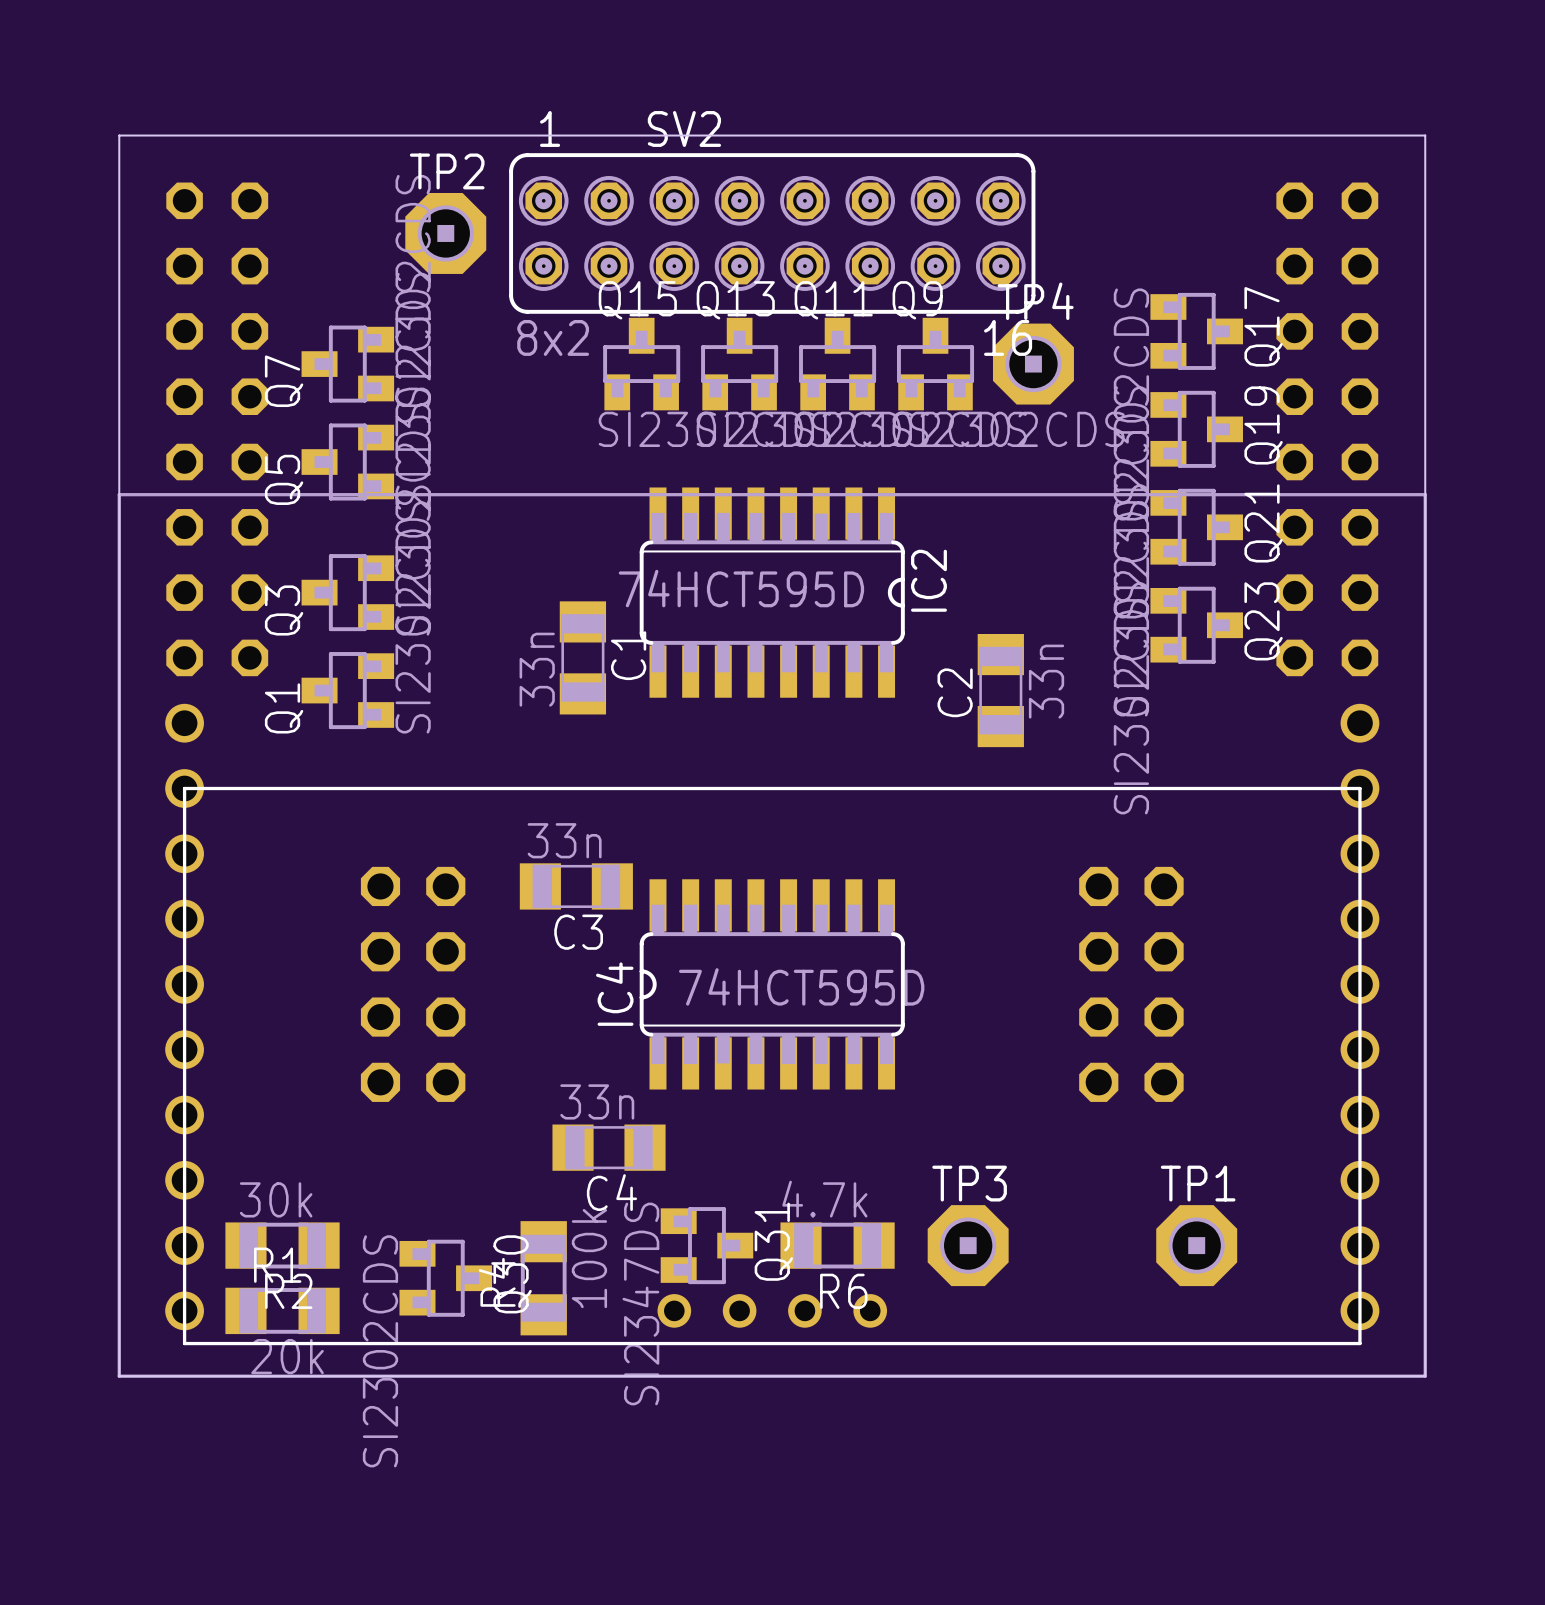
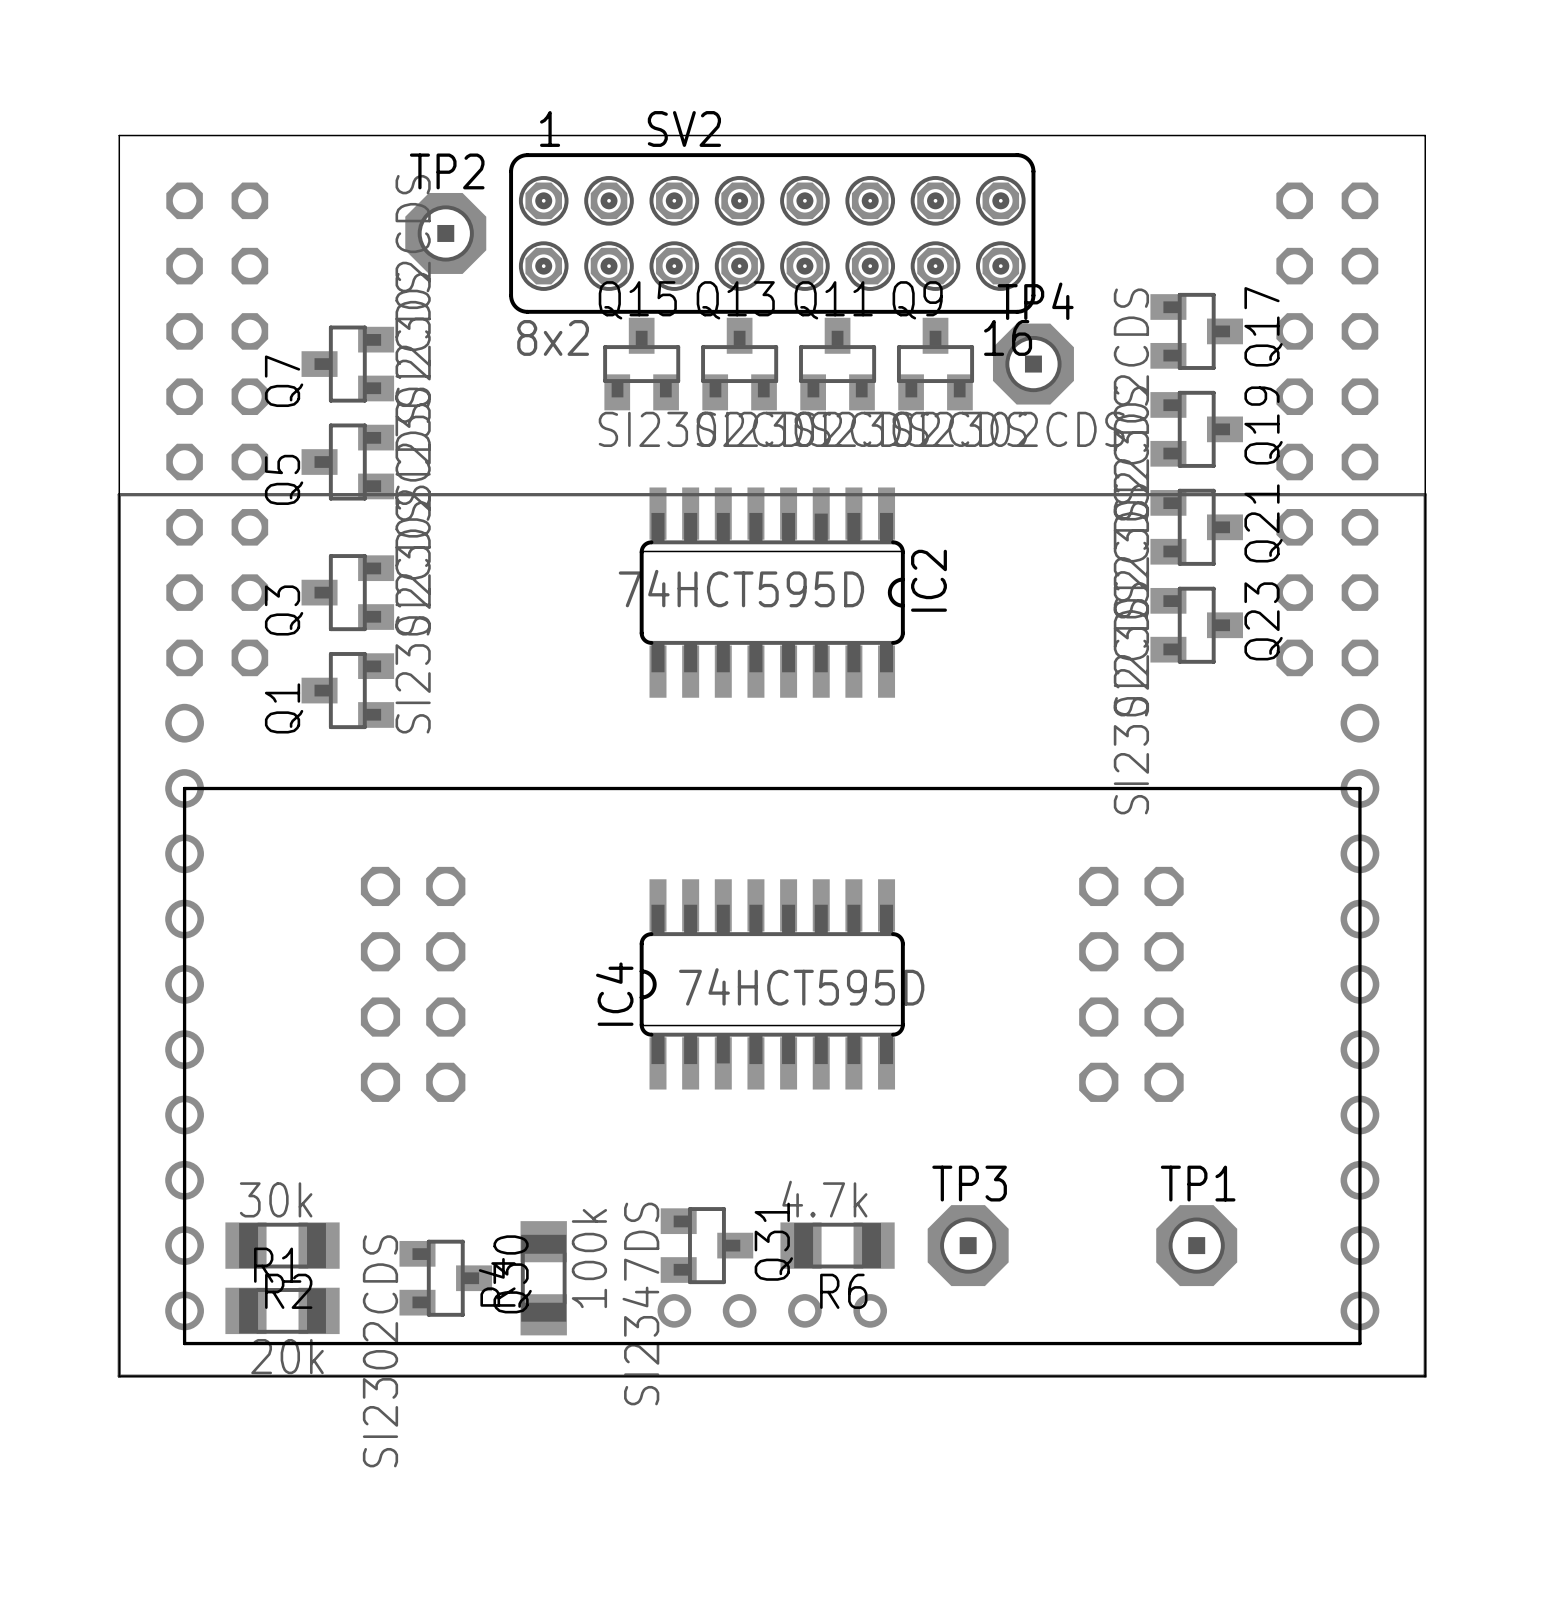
C1: 33n (582, 657) -> none
C2: 33n (1000, 690) -> none
C3: 33n (576, 886) -> none
C4: 33n (609, 1147) -> none

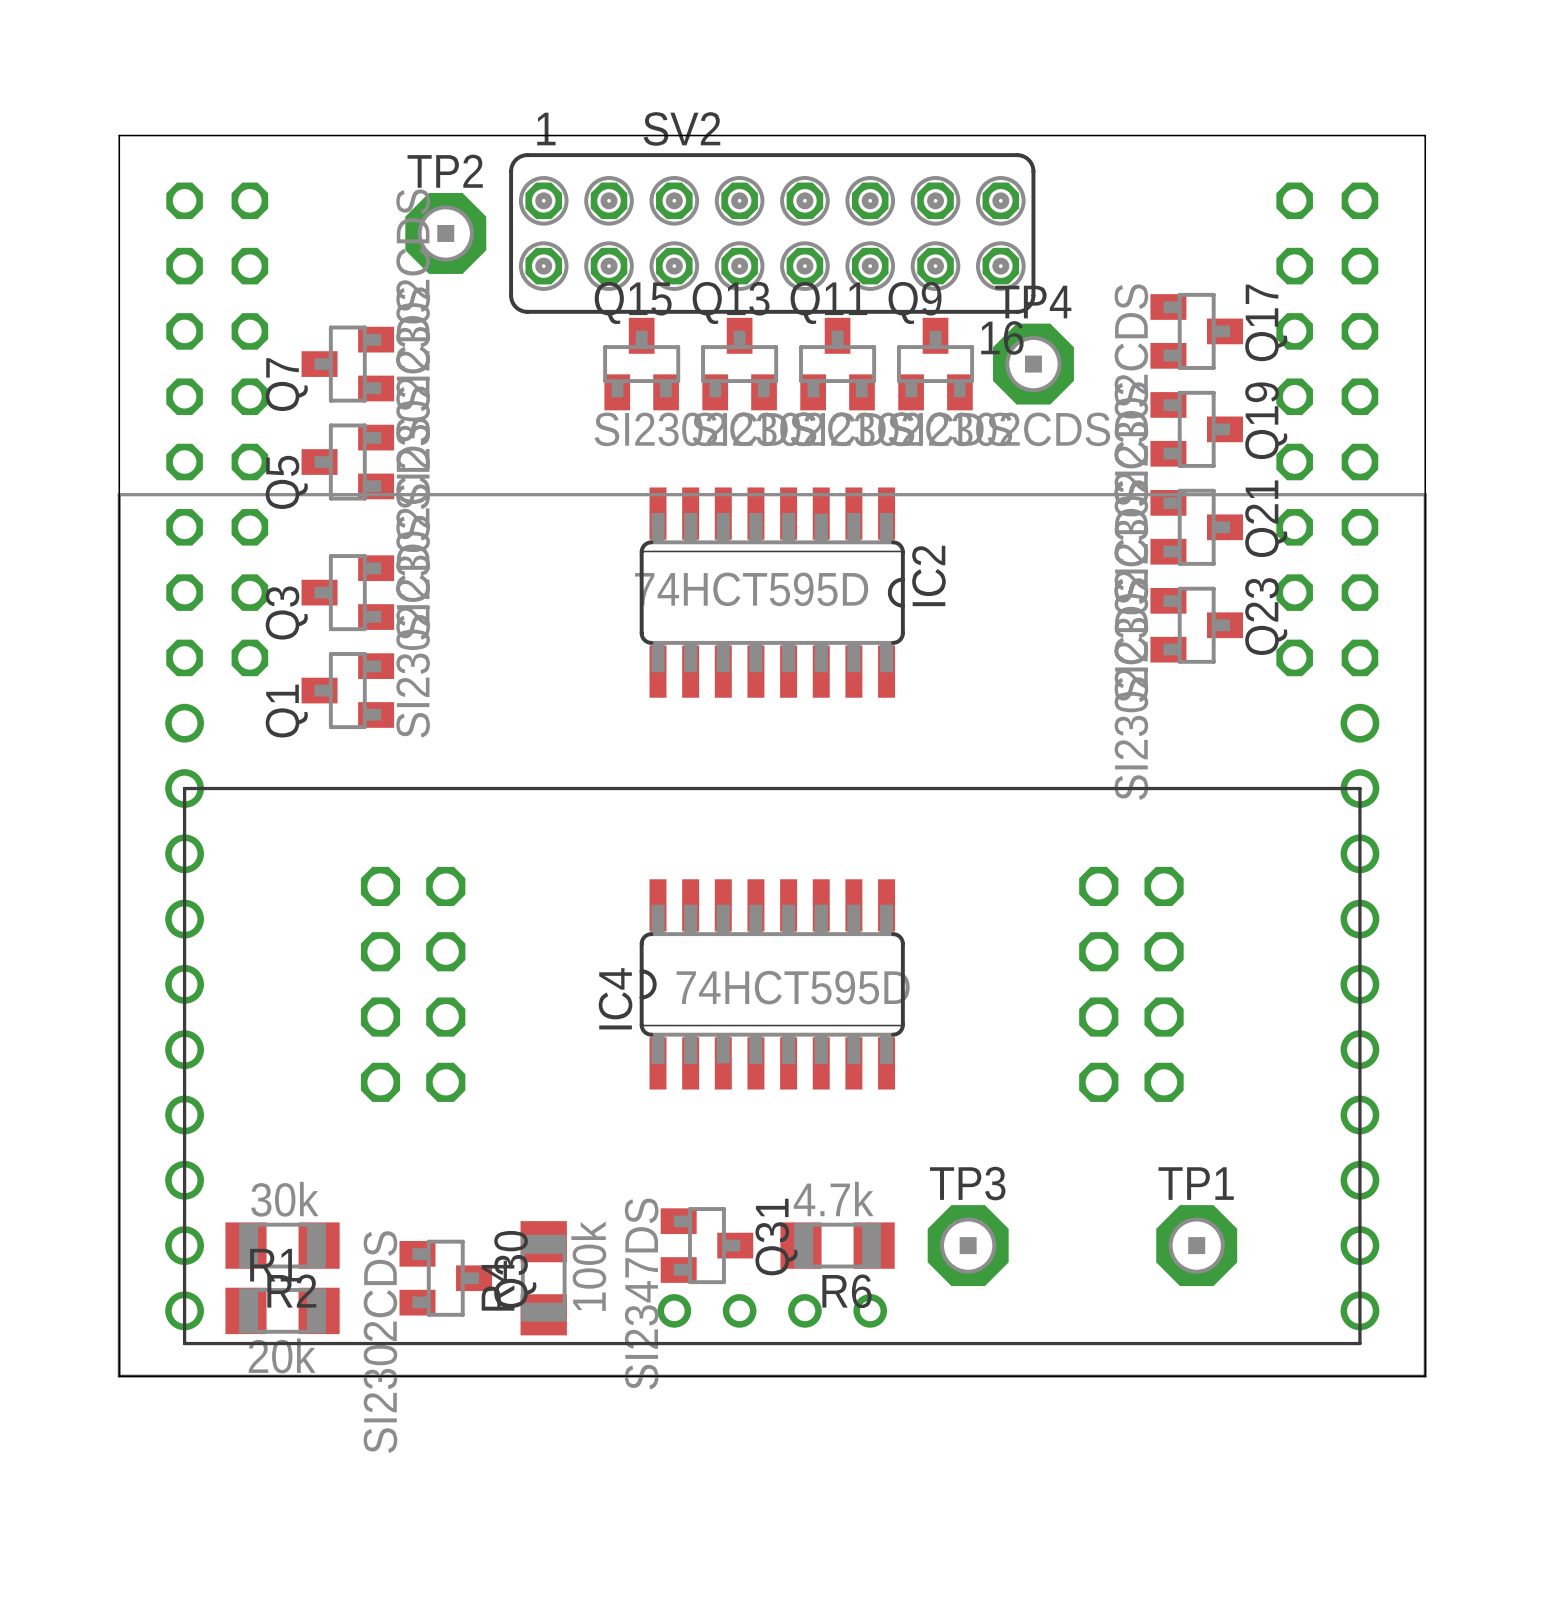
SV2 value: 8x2 (553, 337) -> none

